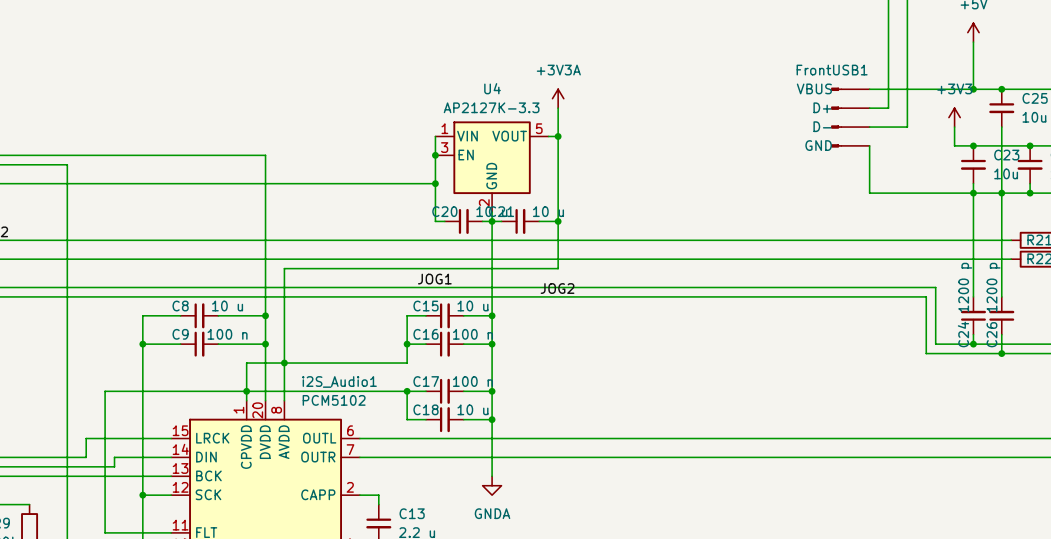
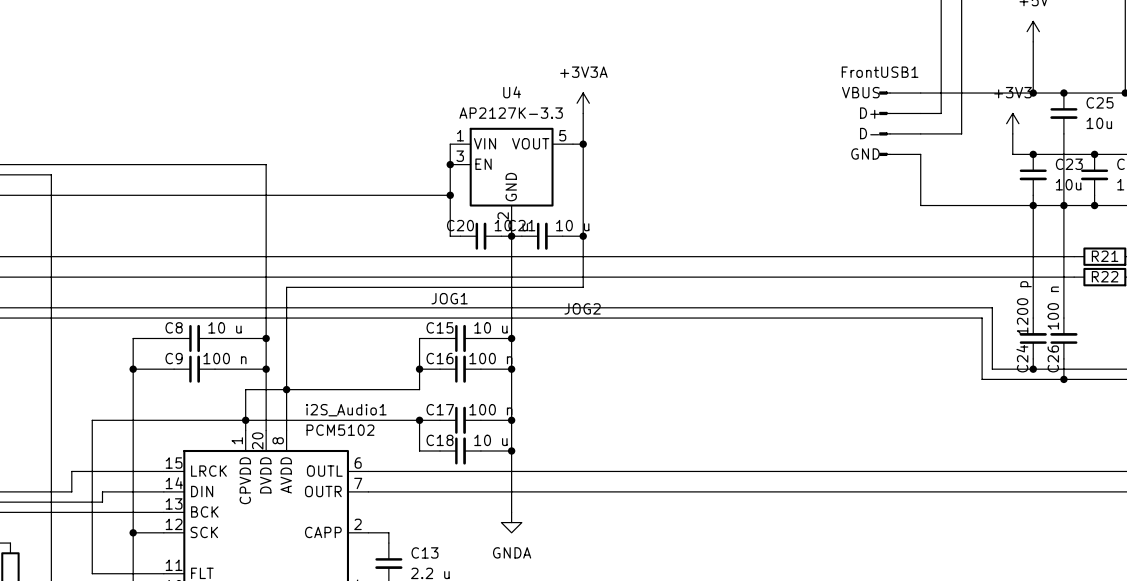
C26 value: 1200 p (993, 287) -> 100 n (1053, 308)

